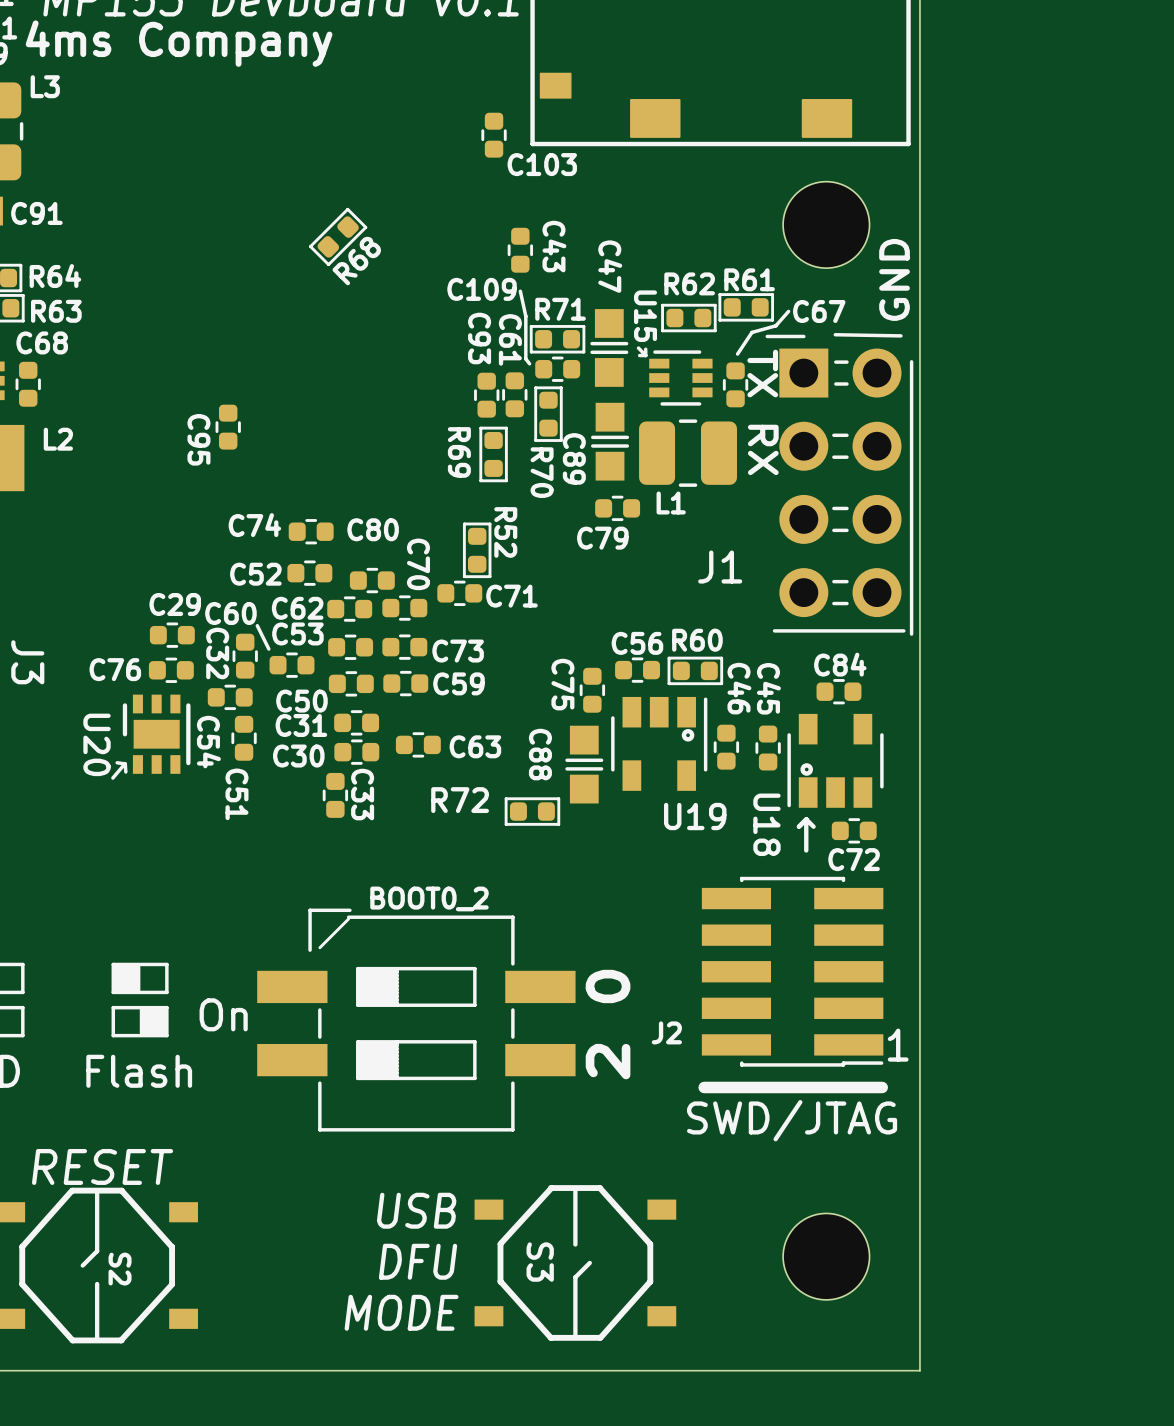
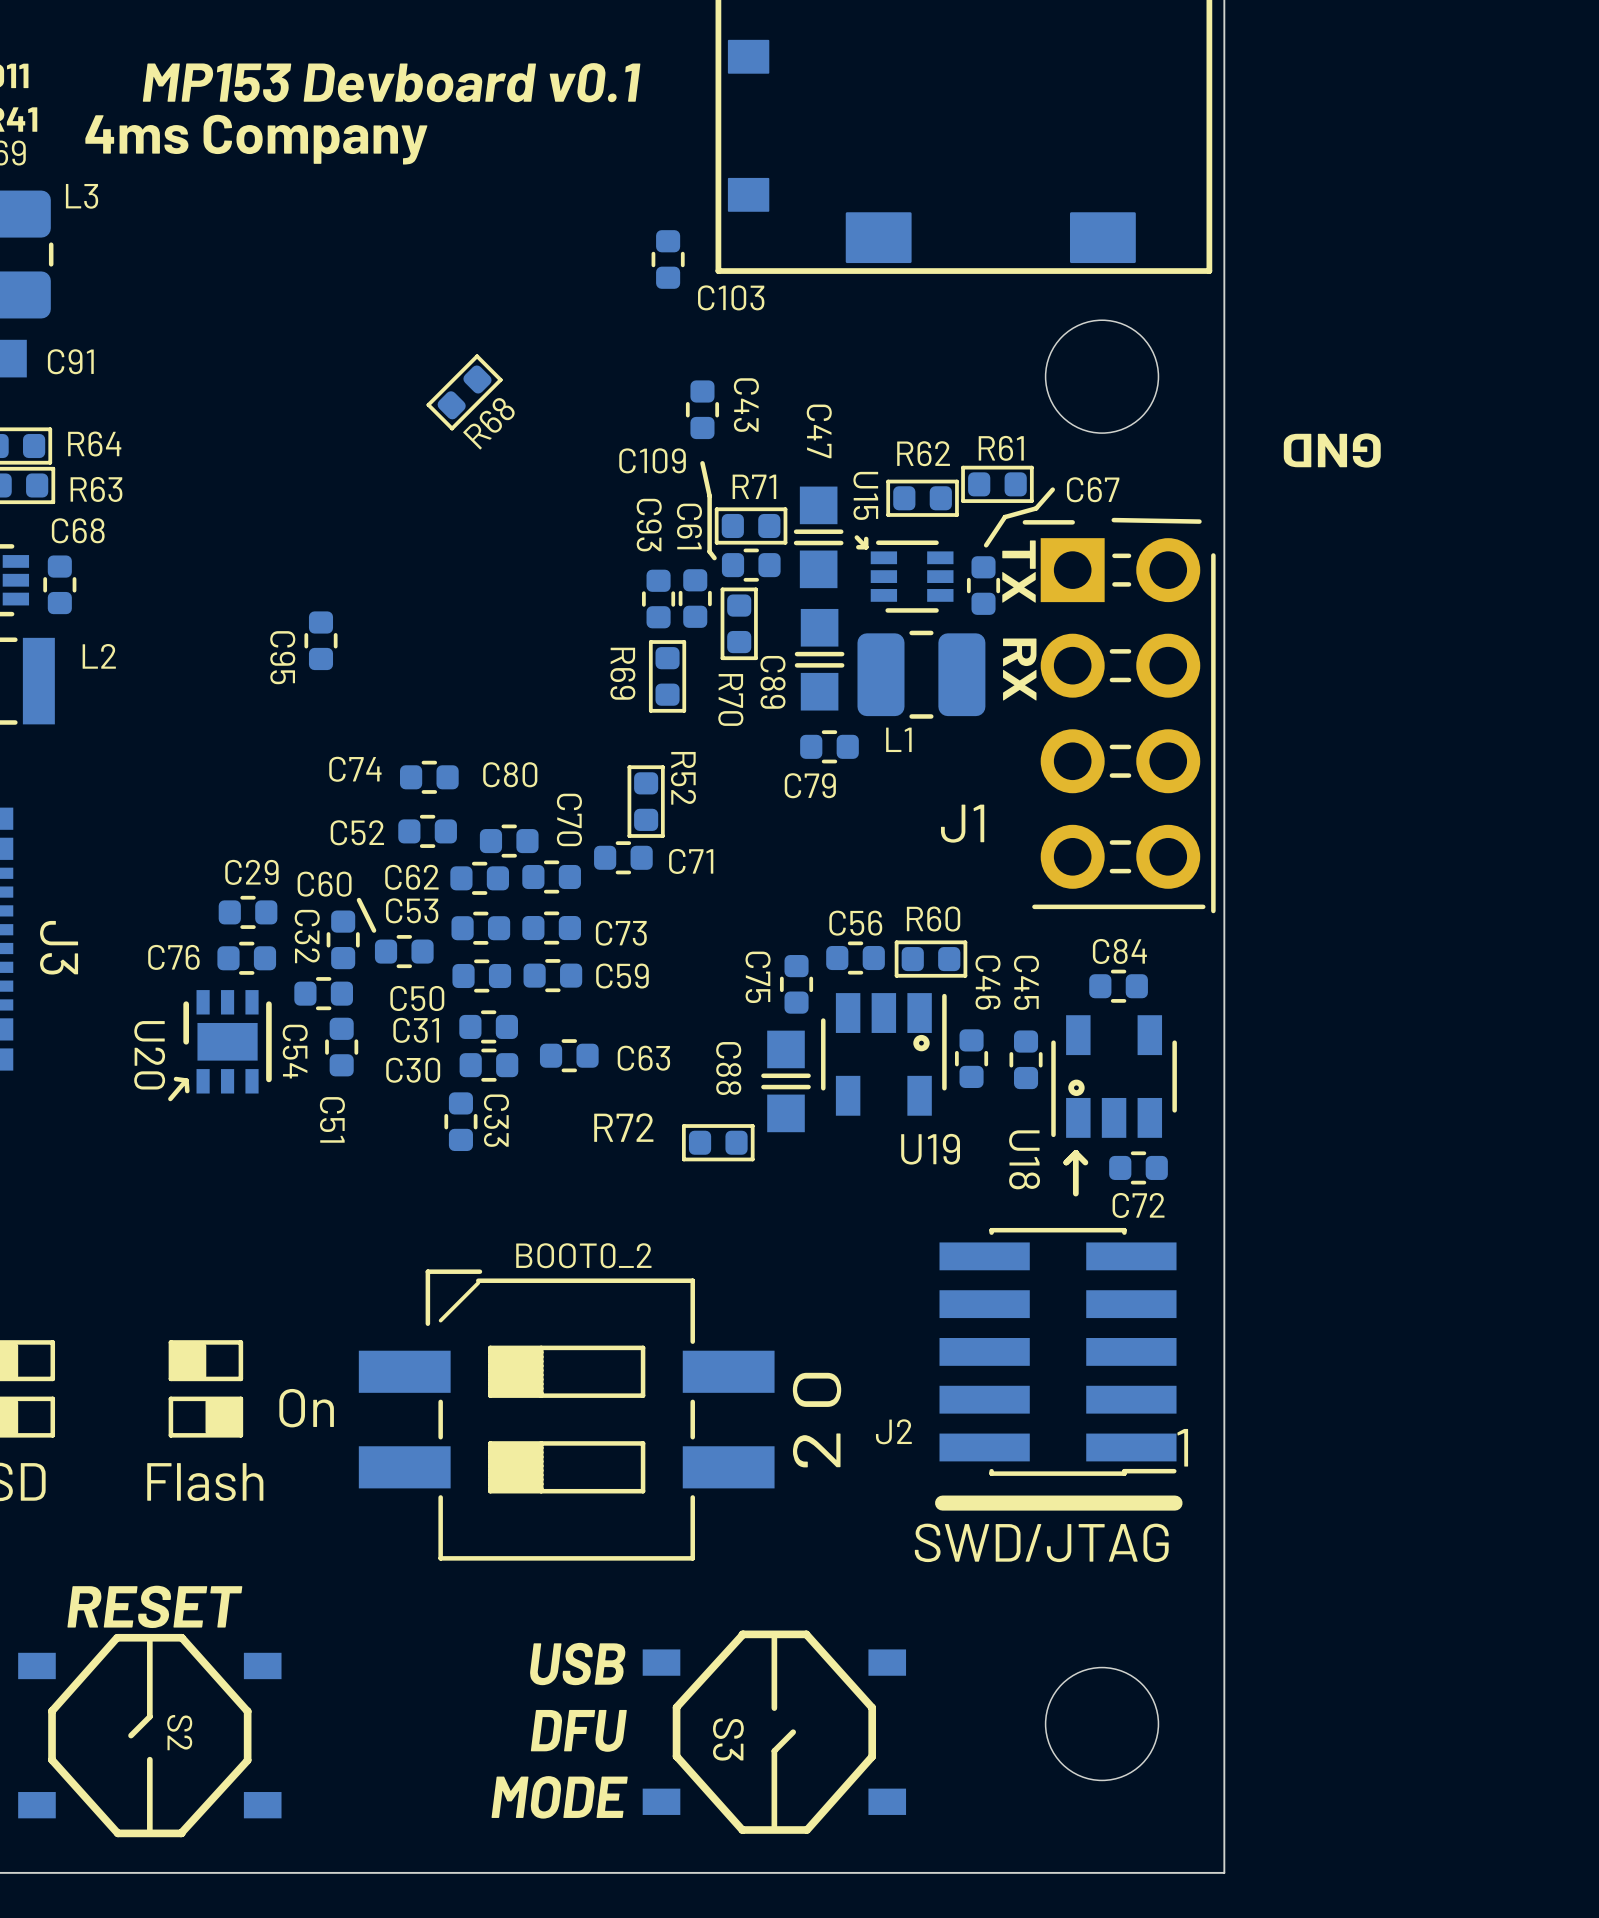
text rotation: 0° (894, 279) -> 90° counterclockwise (1332, 450)

